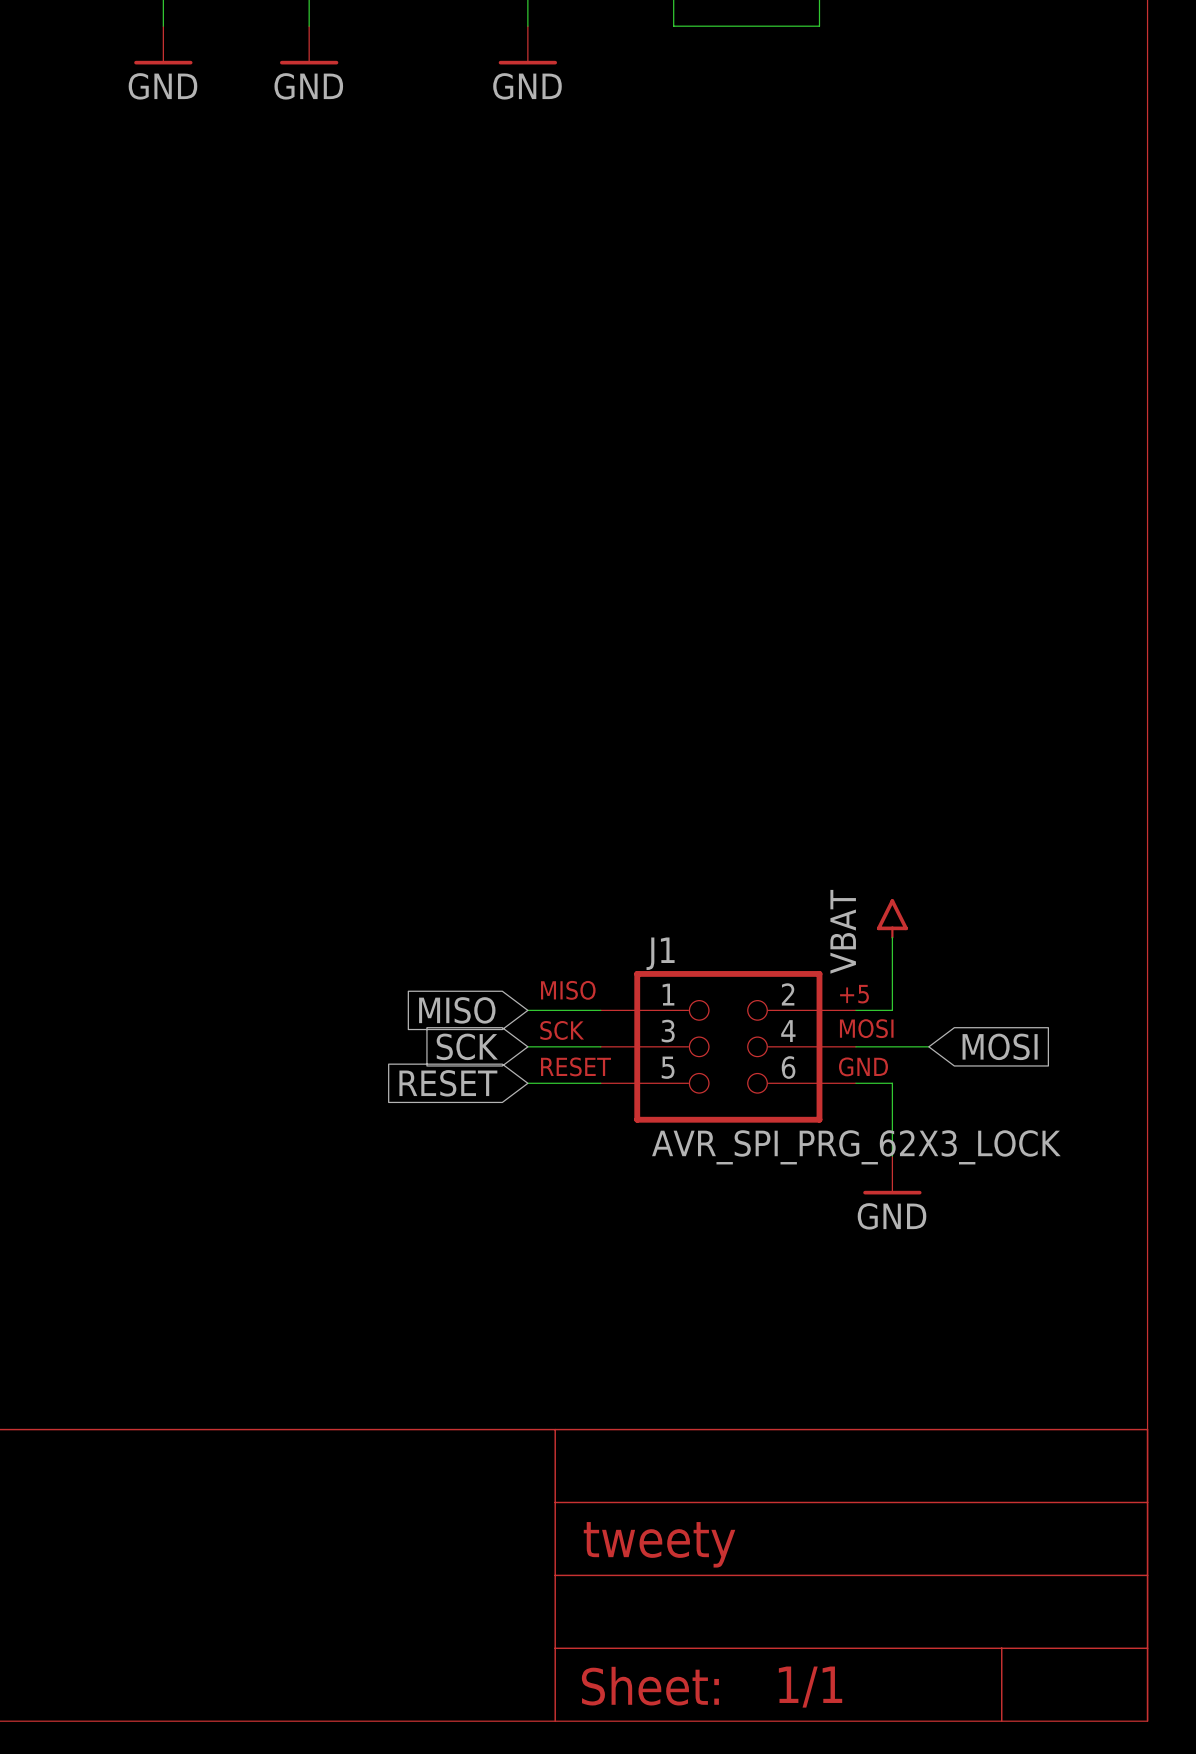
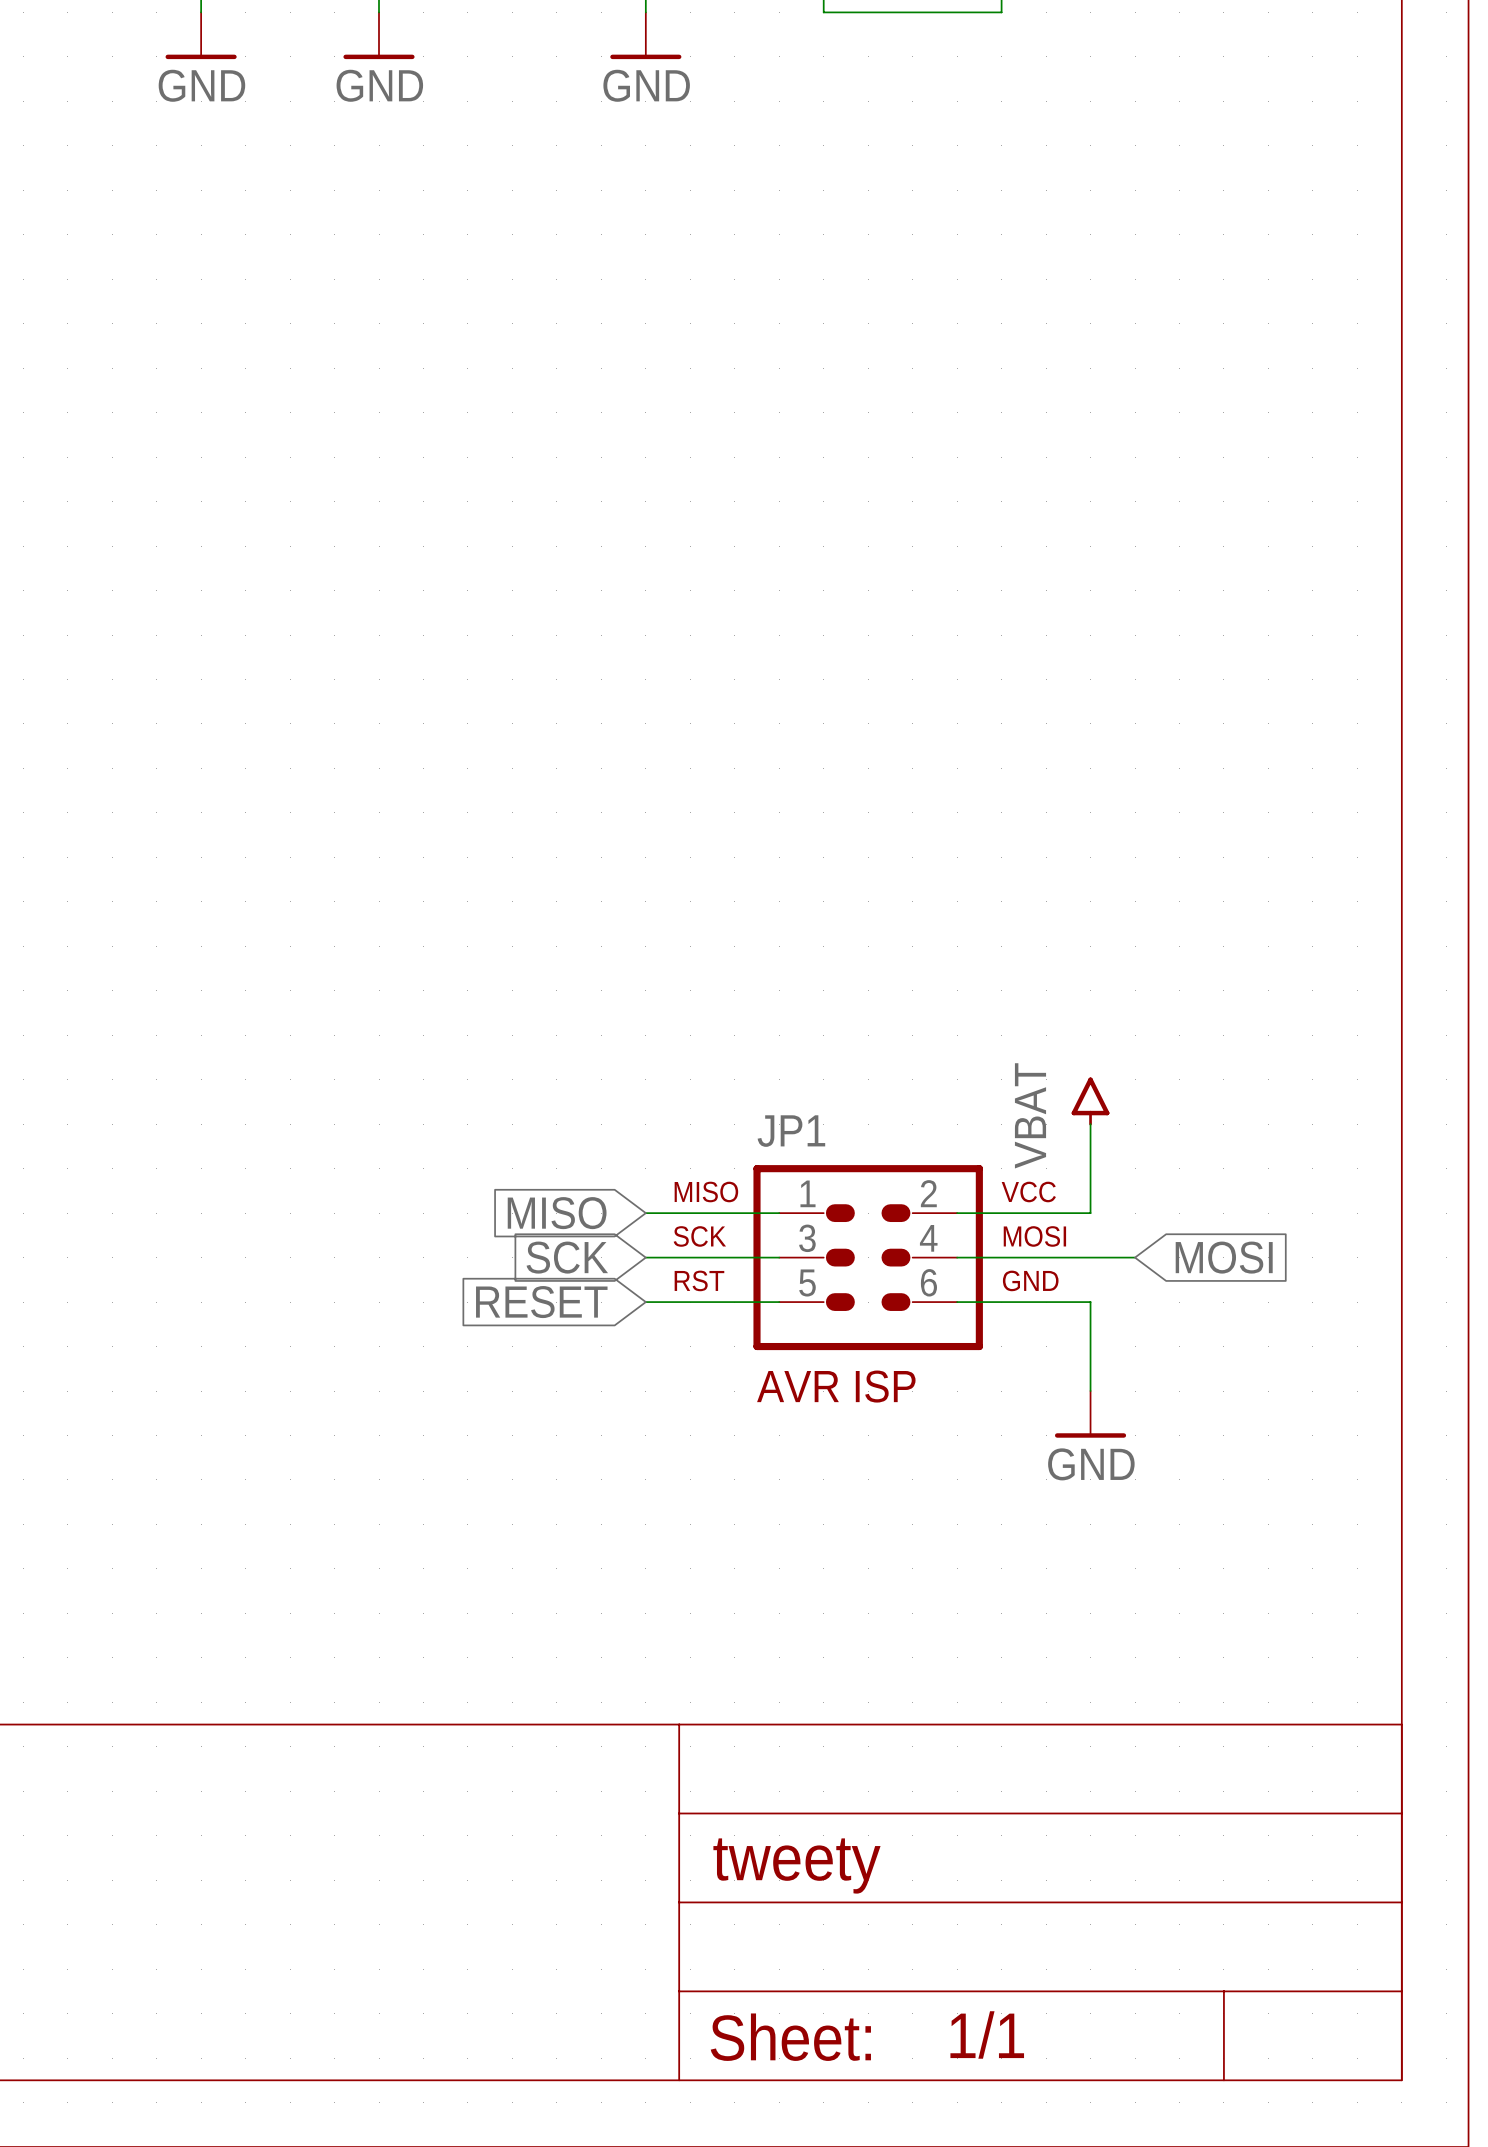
JP1: none -> (868, 1257)
J1: AVR_SPI_PRG_62X3_LOCK (728, 1046) -> none

